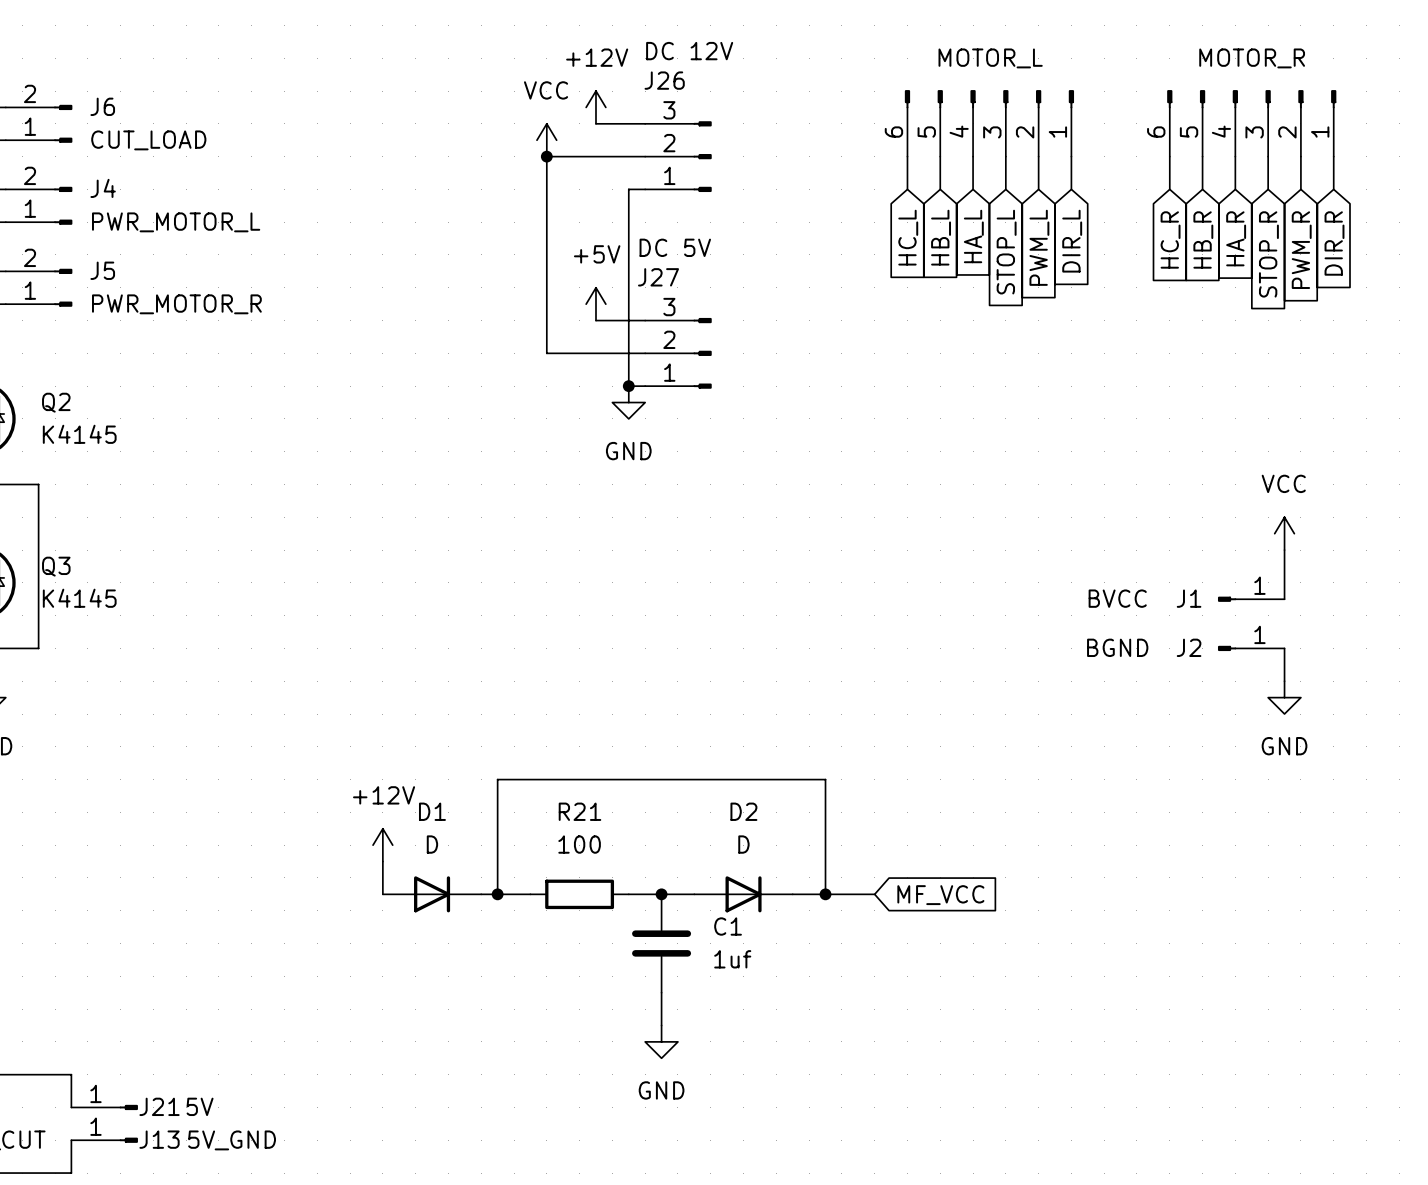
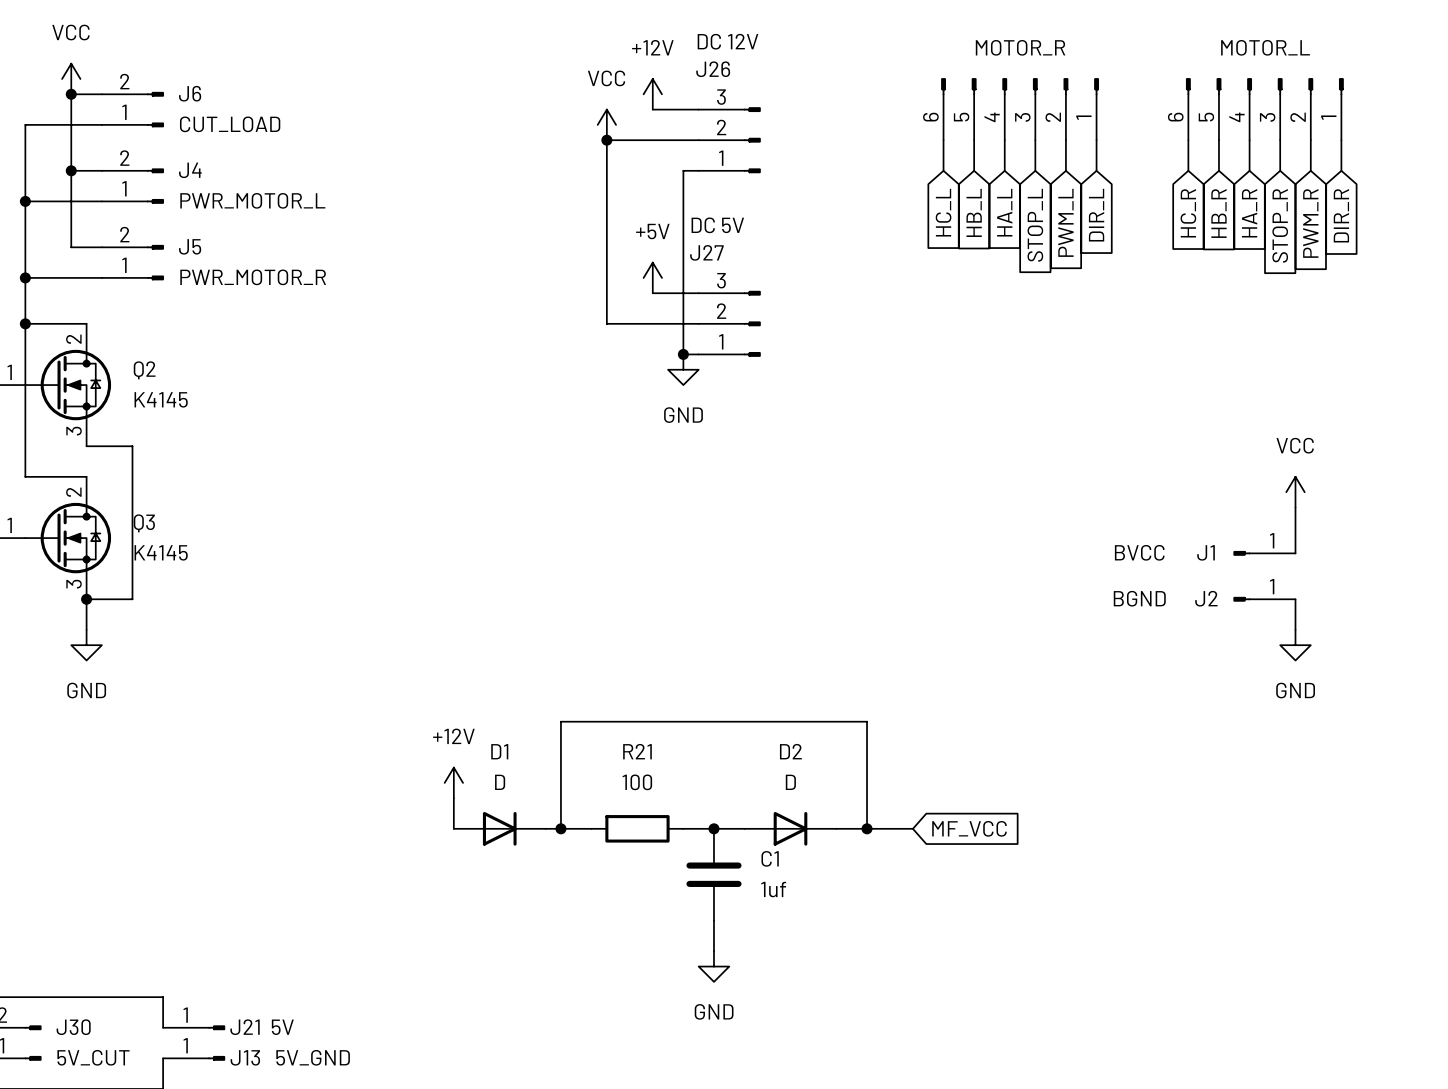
part value: MOTOR_L (990, 58) -> MOTOR_R (1020, 47)
part value: MOTOR_R (1252, 58) -> MOTOR_L (1265, 47)

